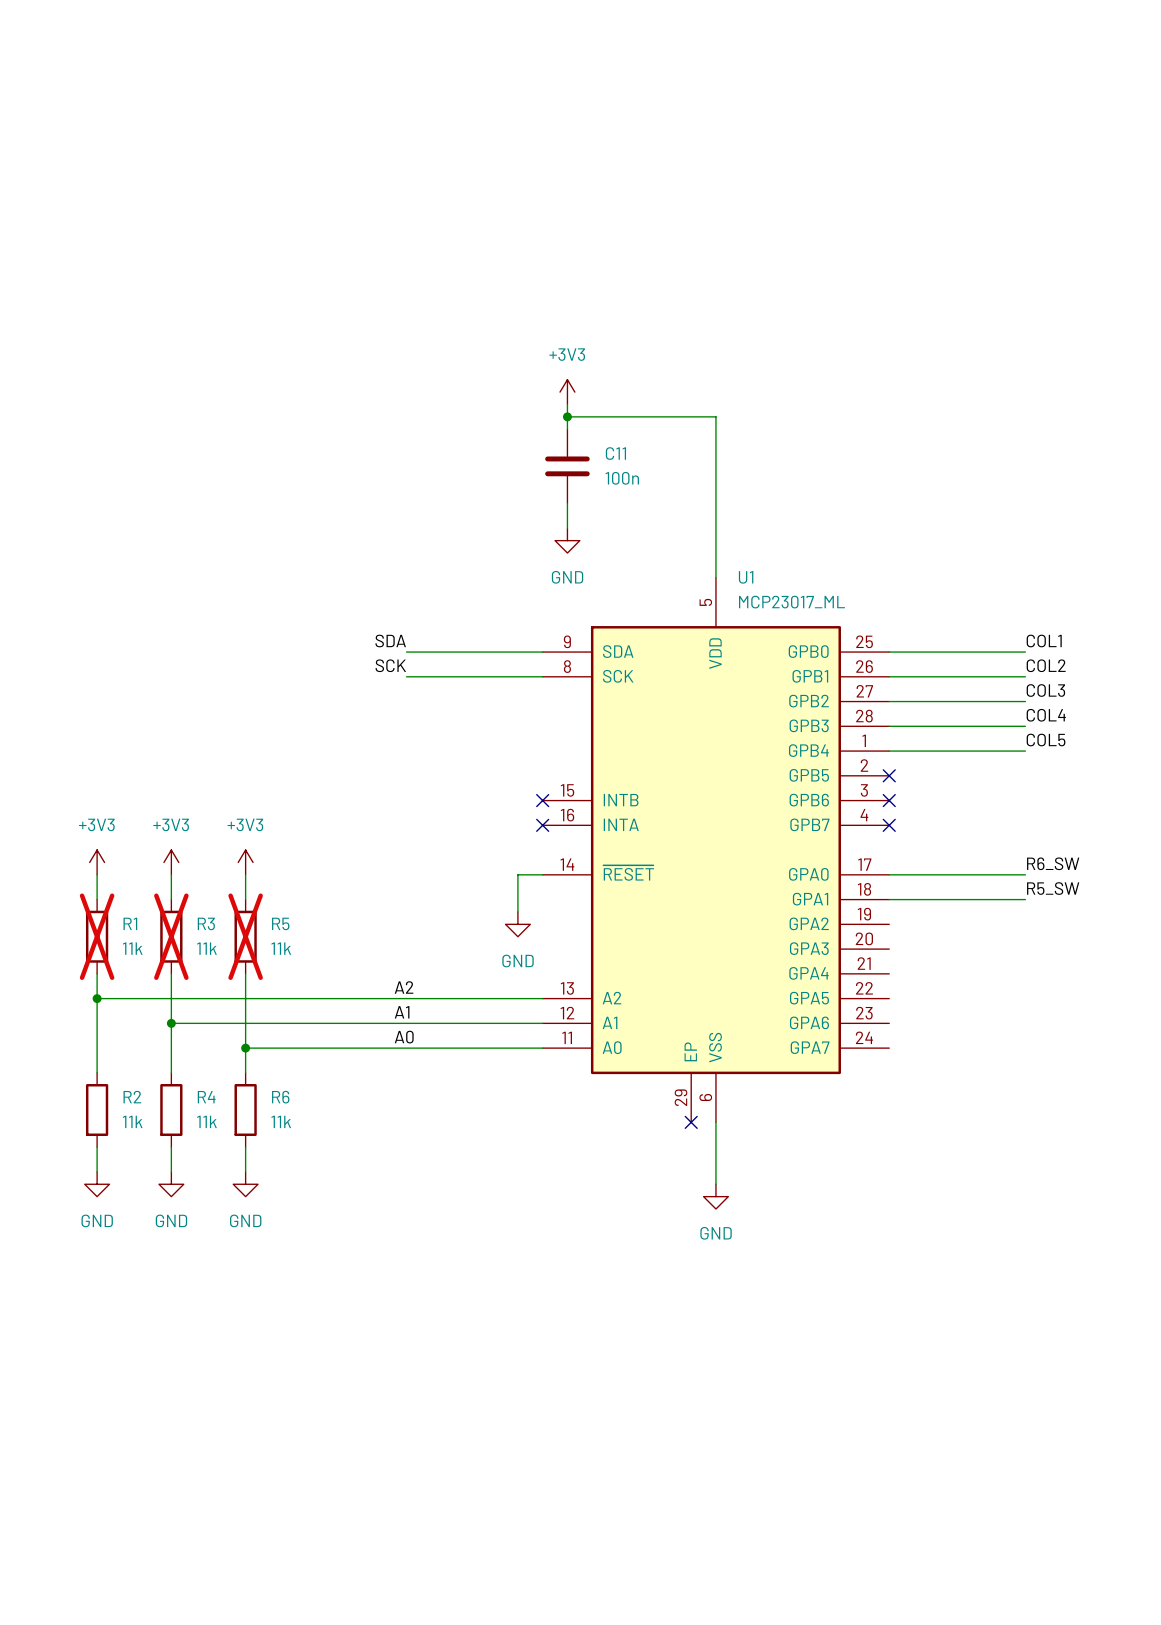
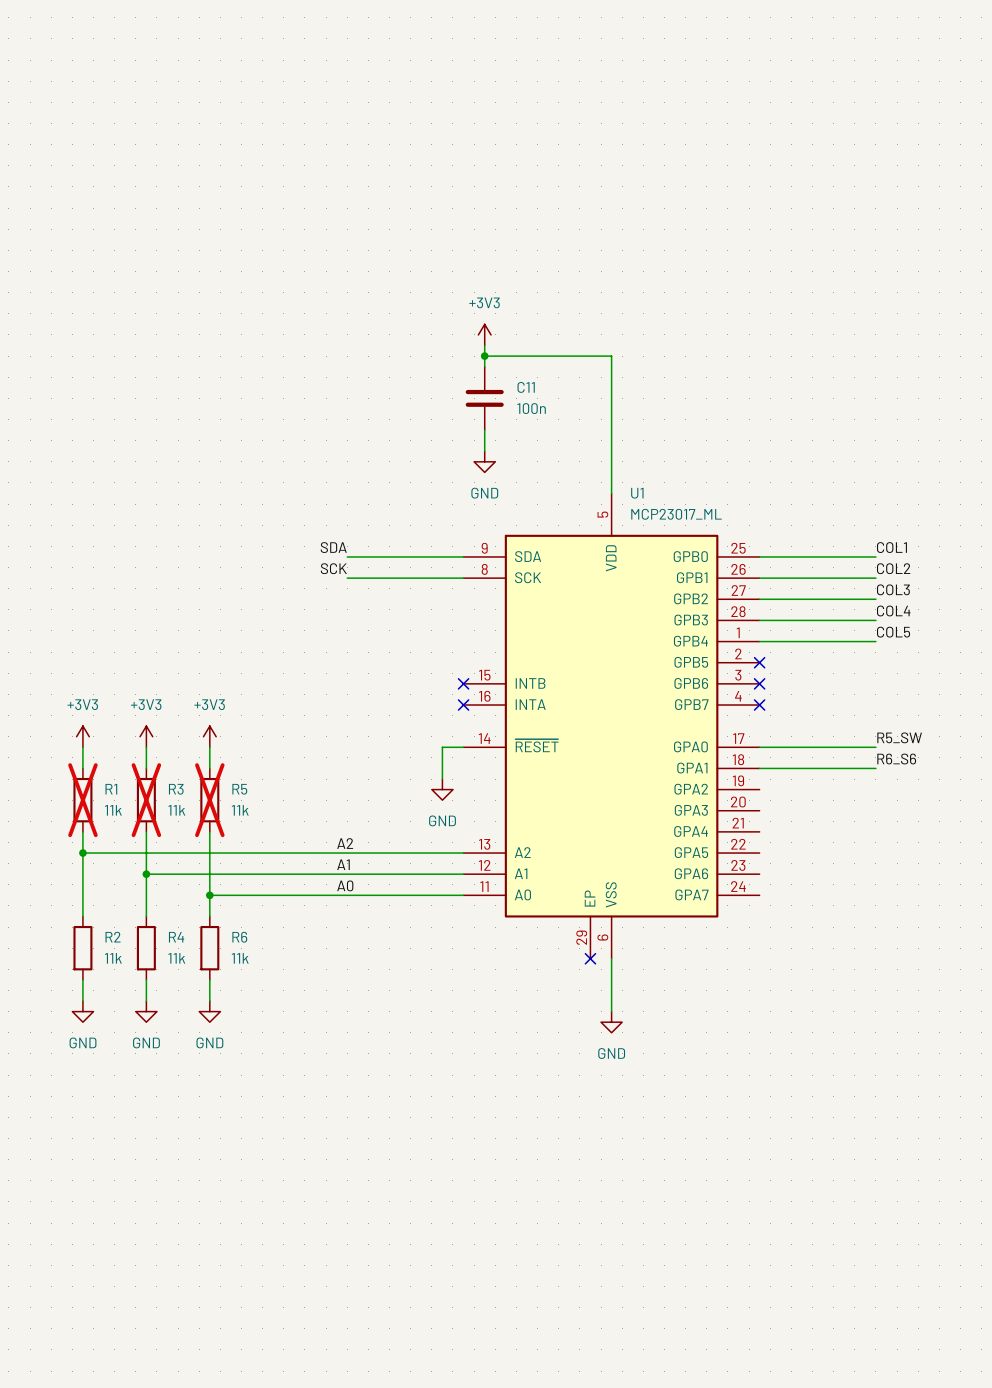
label: R6_SW (1053, 863) -> R5_SW (899, 737)
label: R5_SW (1053, 888) -> R6_S6 (896, 759)

